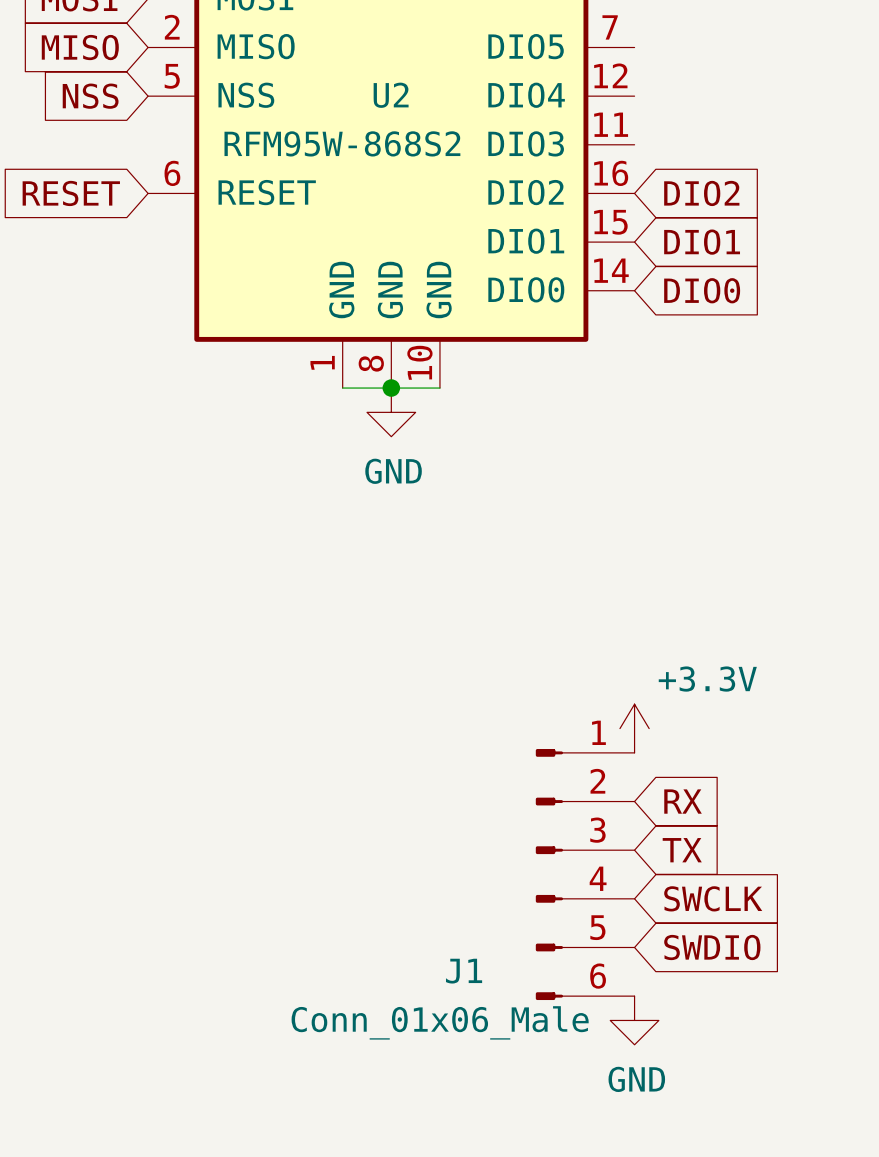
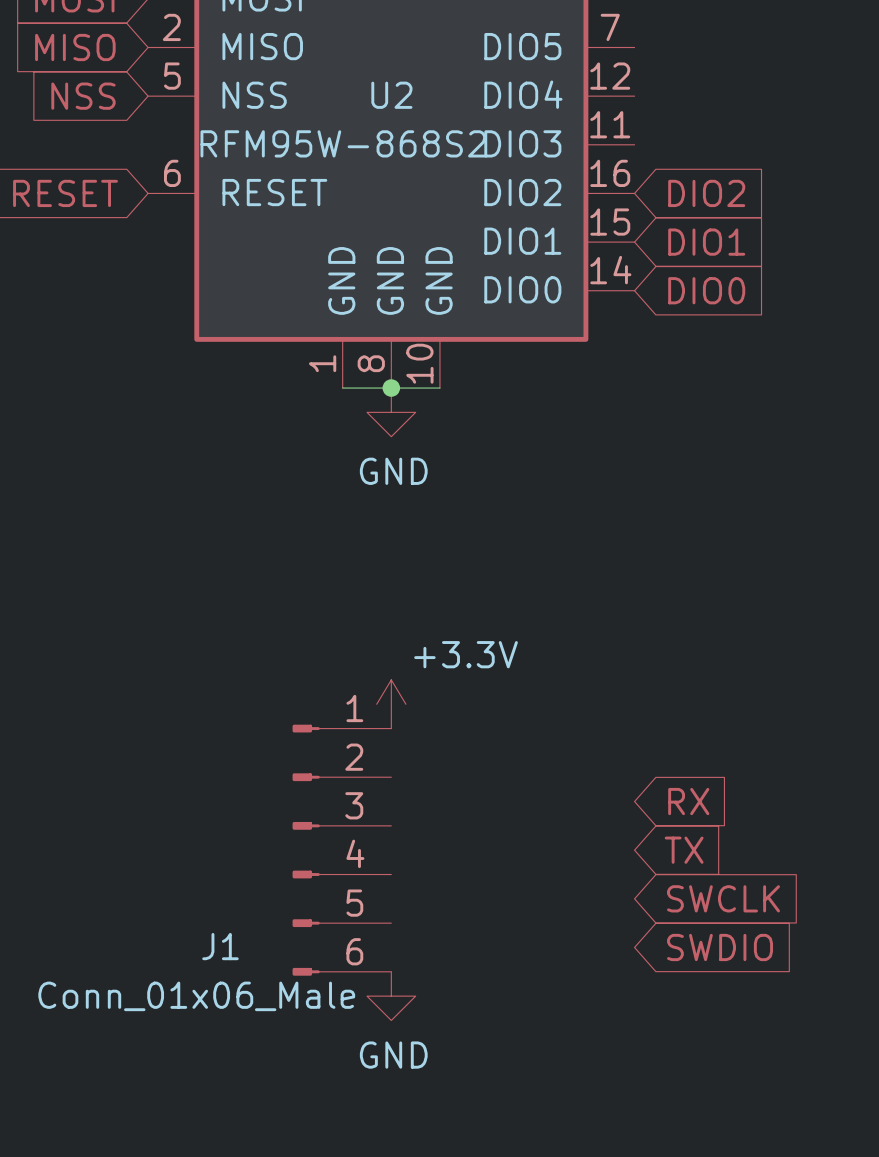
power symbol position: +3.3V (634, 728) -> +3.3V (391, 704)
J1 position: (585, 874) -> (341, 850)
power symbol position: GND (634, 1020) -> GND (391, 996)

